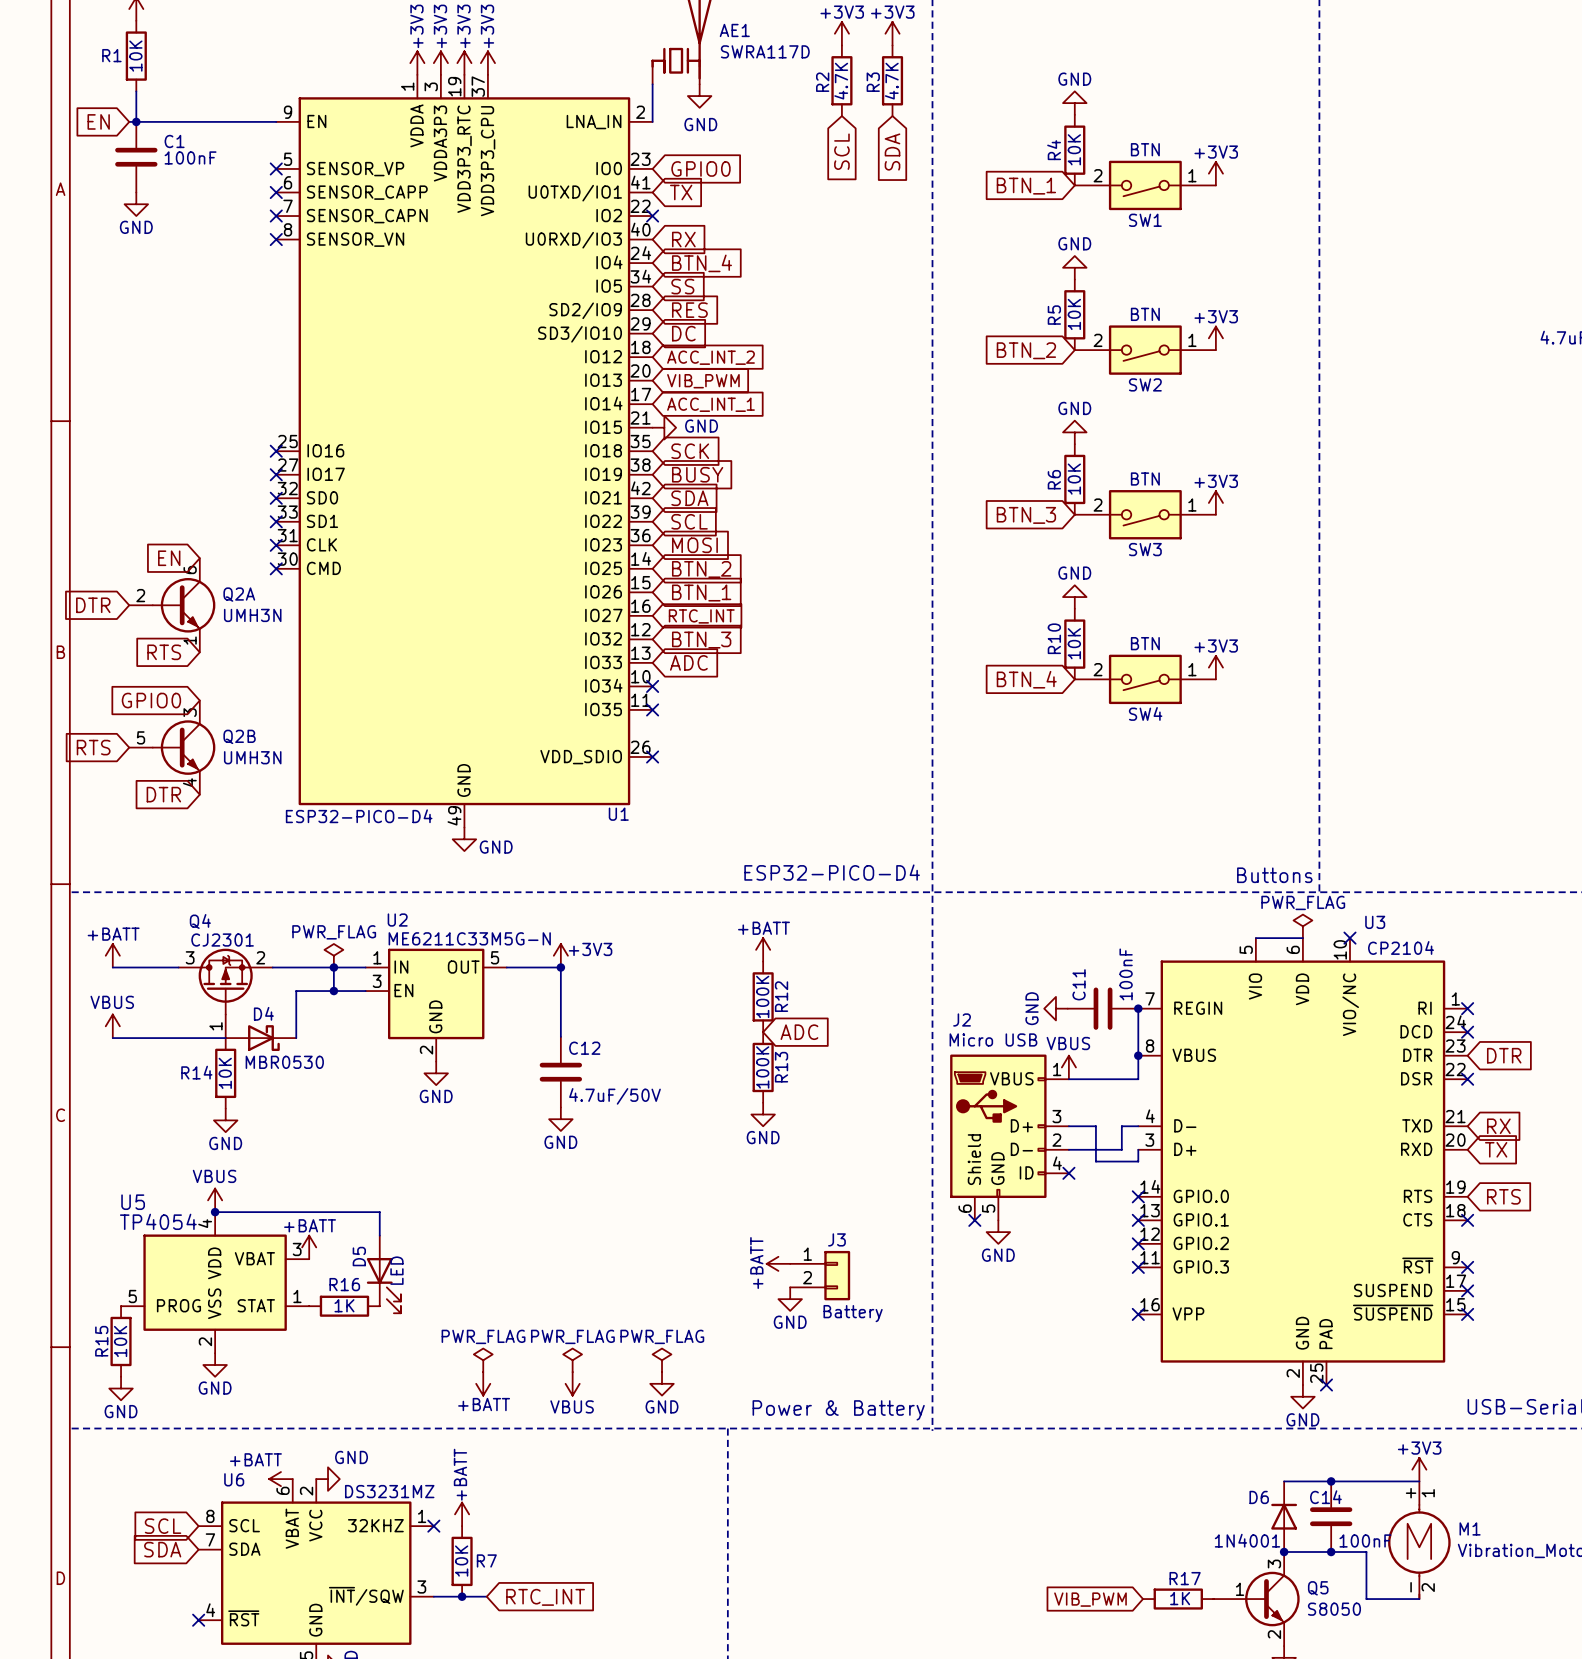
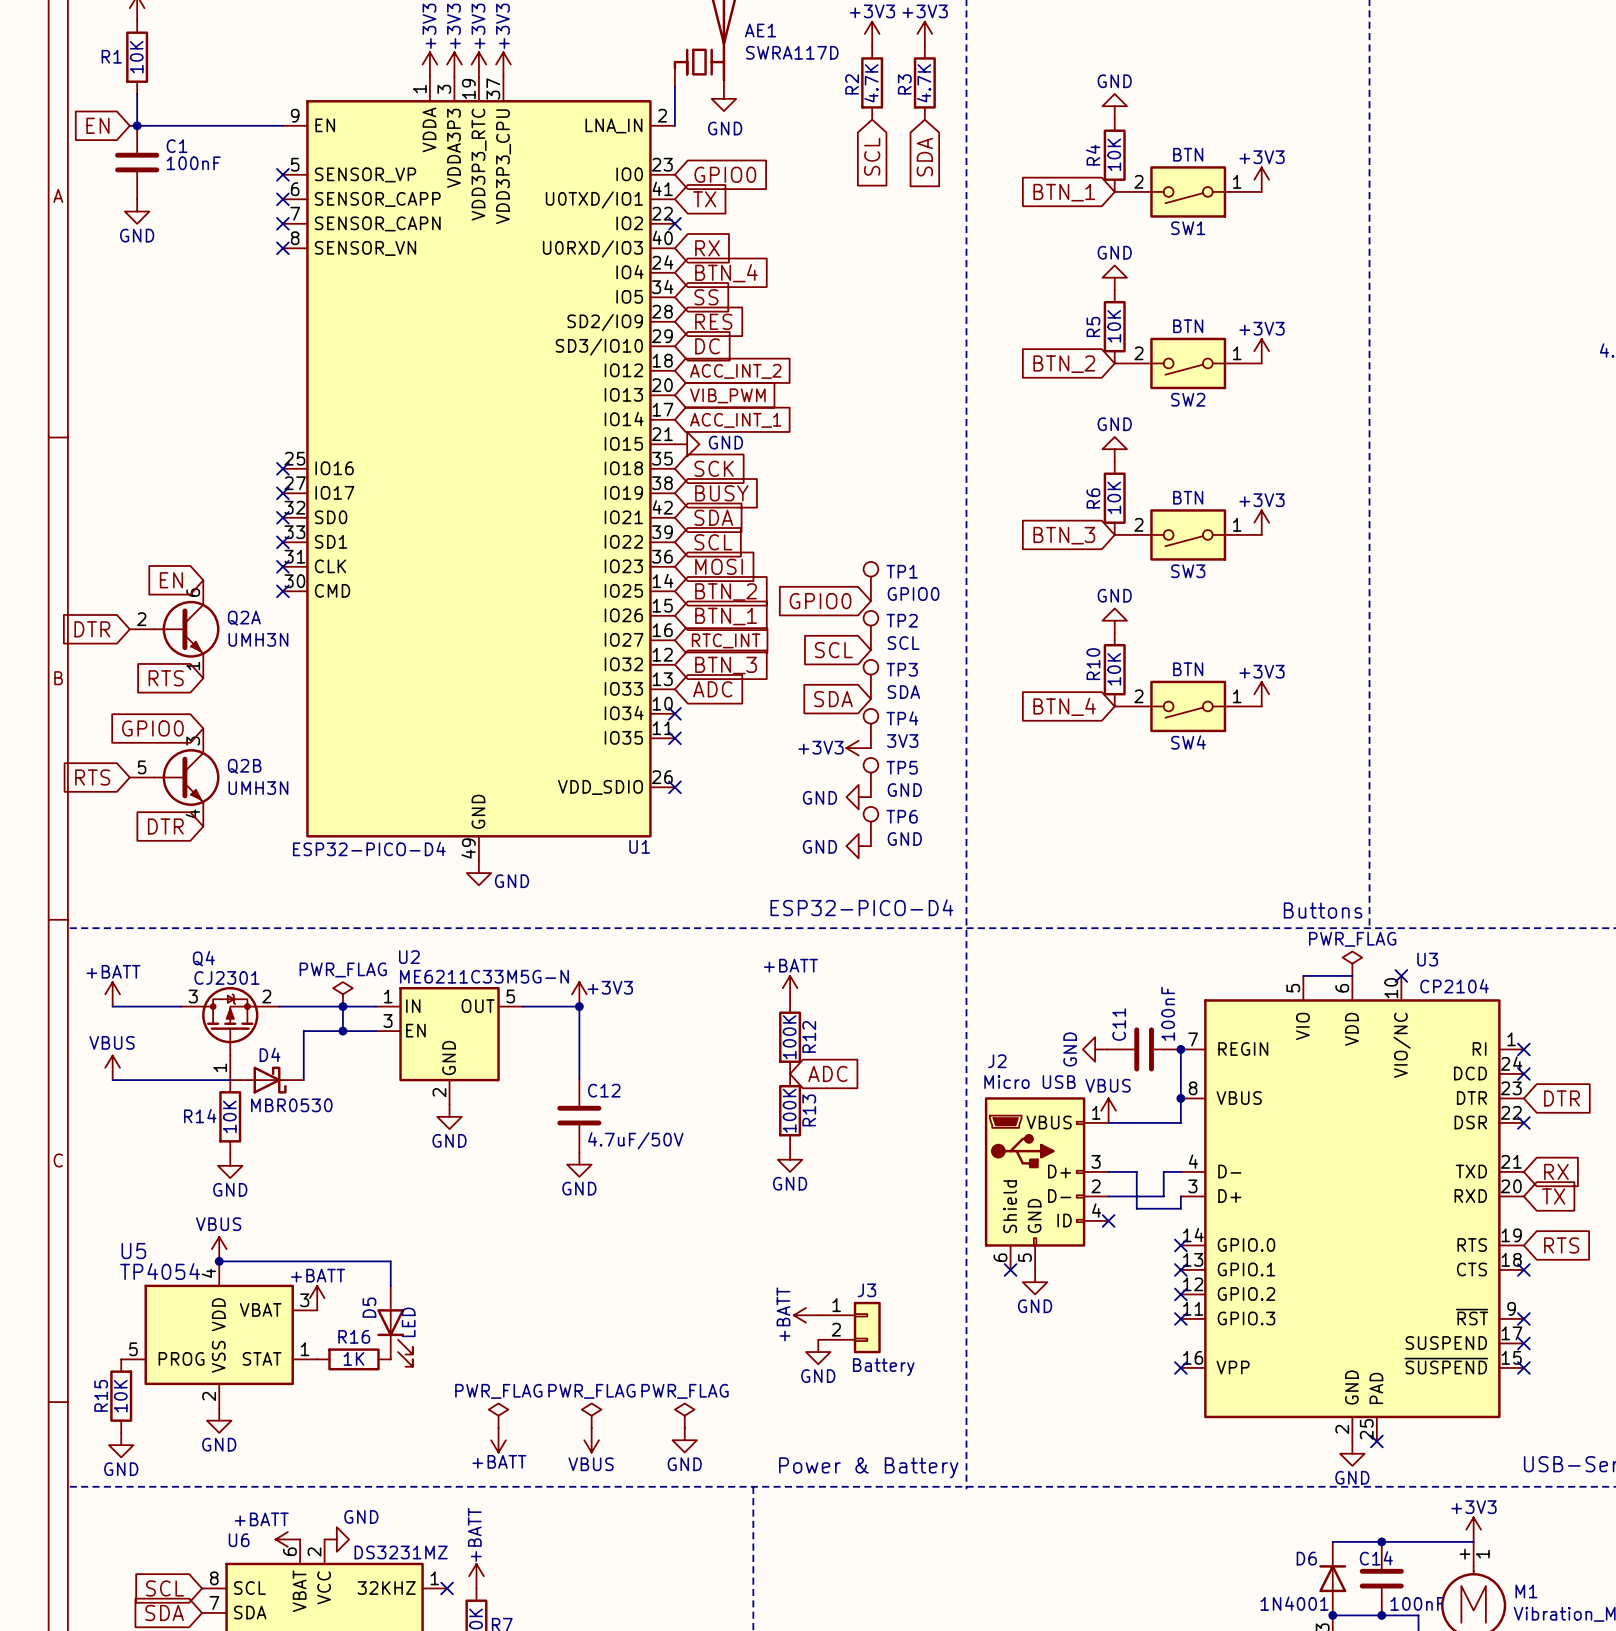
TP1: none -> GPIO0 (870, 581)
global label: none -> GPIO0 (820, 601)
TP2: none -> SCL (870, 630)
global label: none -> SCL (833, 650)
TP3: none -> SDA (870, 679)
global label: none -> SDA (833, 699)
TP4: none -> 3V3 (870, 728)
power symbol: none -> +3V3 (858, 748)
TP5: none -> GND (870, 777)
power symbol: none -> GND (858, 797)
TP6: none -> GND (870, 826)
power symbol: none -> GND (858, 846)

